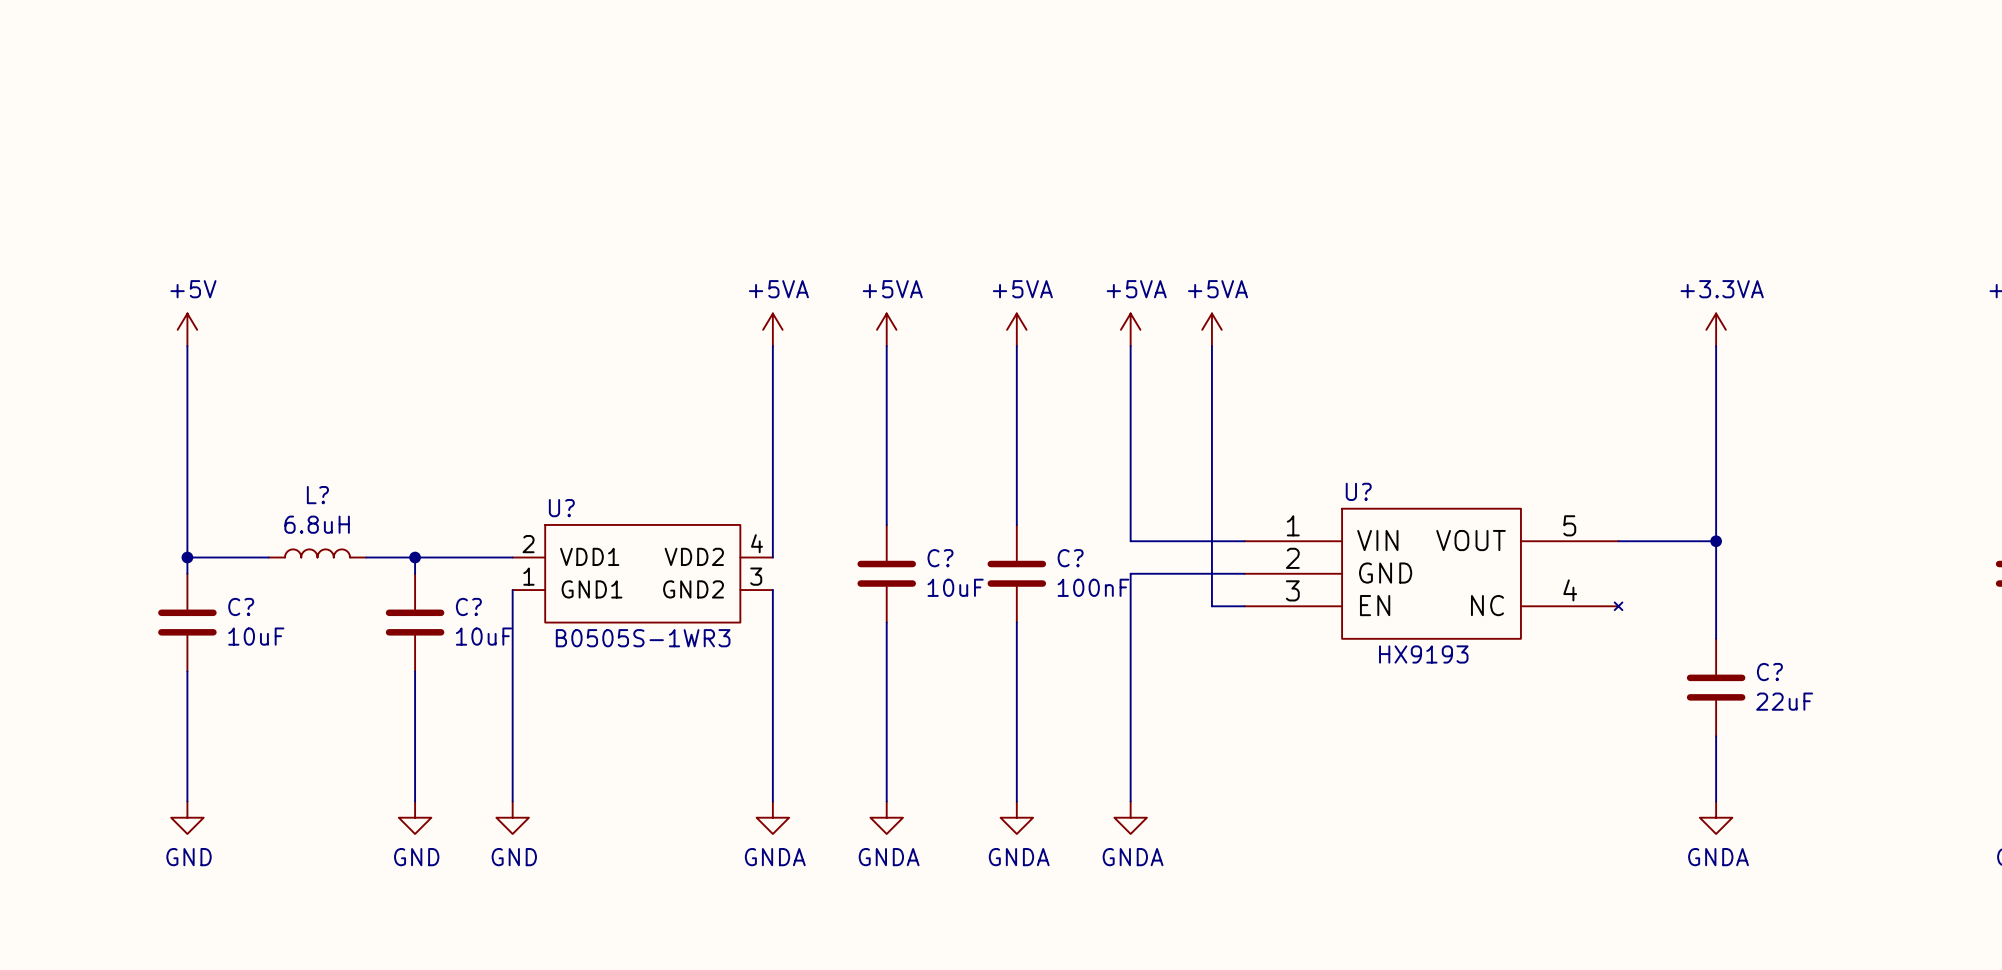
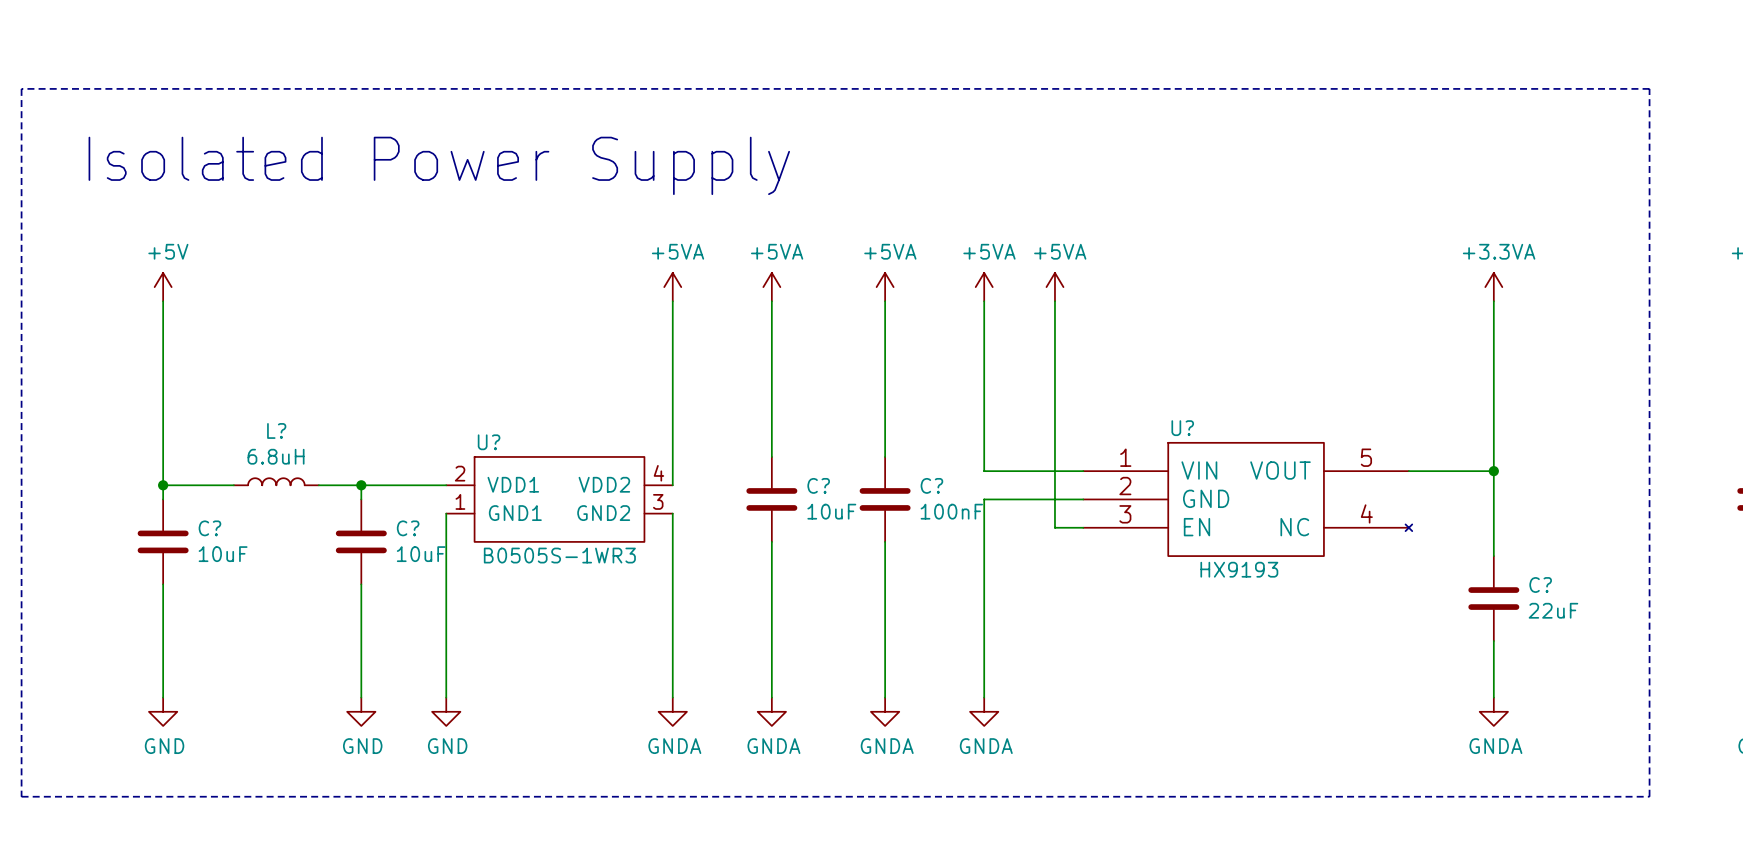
line: none -> (21, 88) (1649, 88) (1649, 796) (21, 796) (21, 88)
text: none -> Isolated Power Supply (439, 165)

